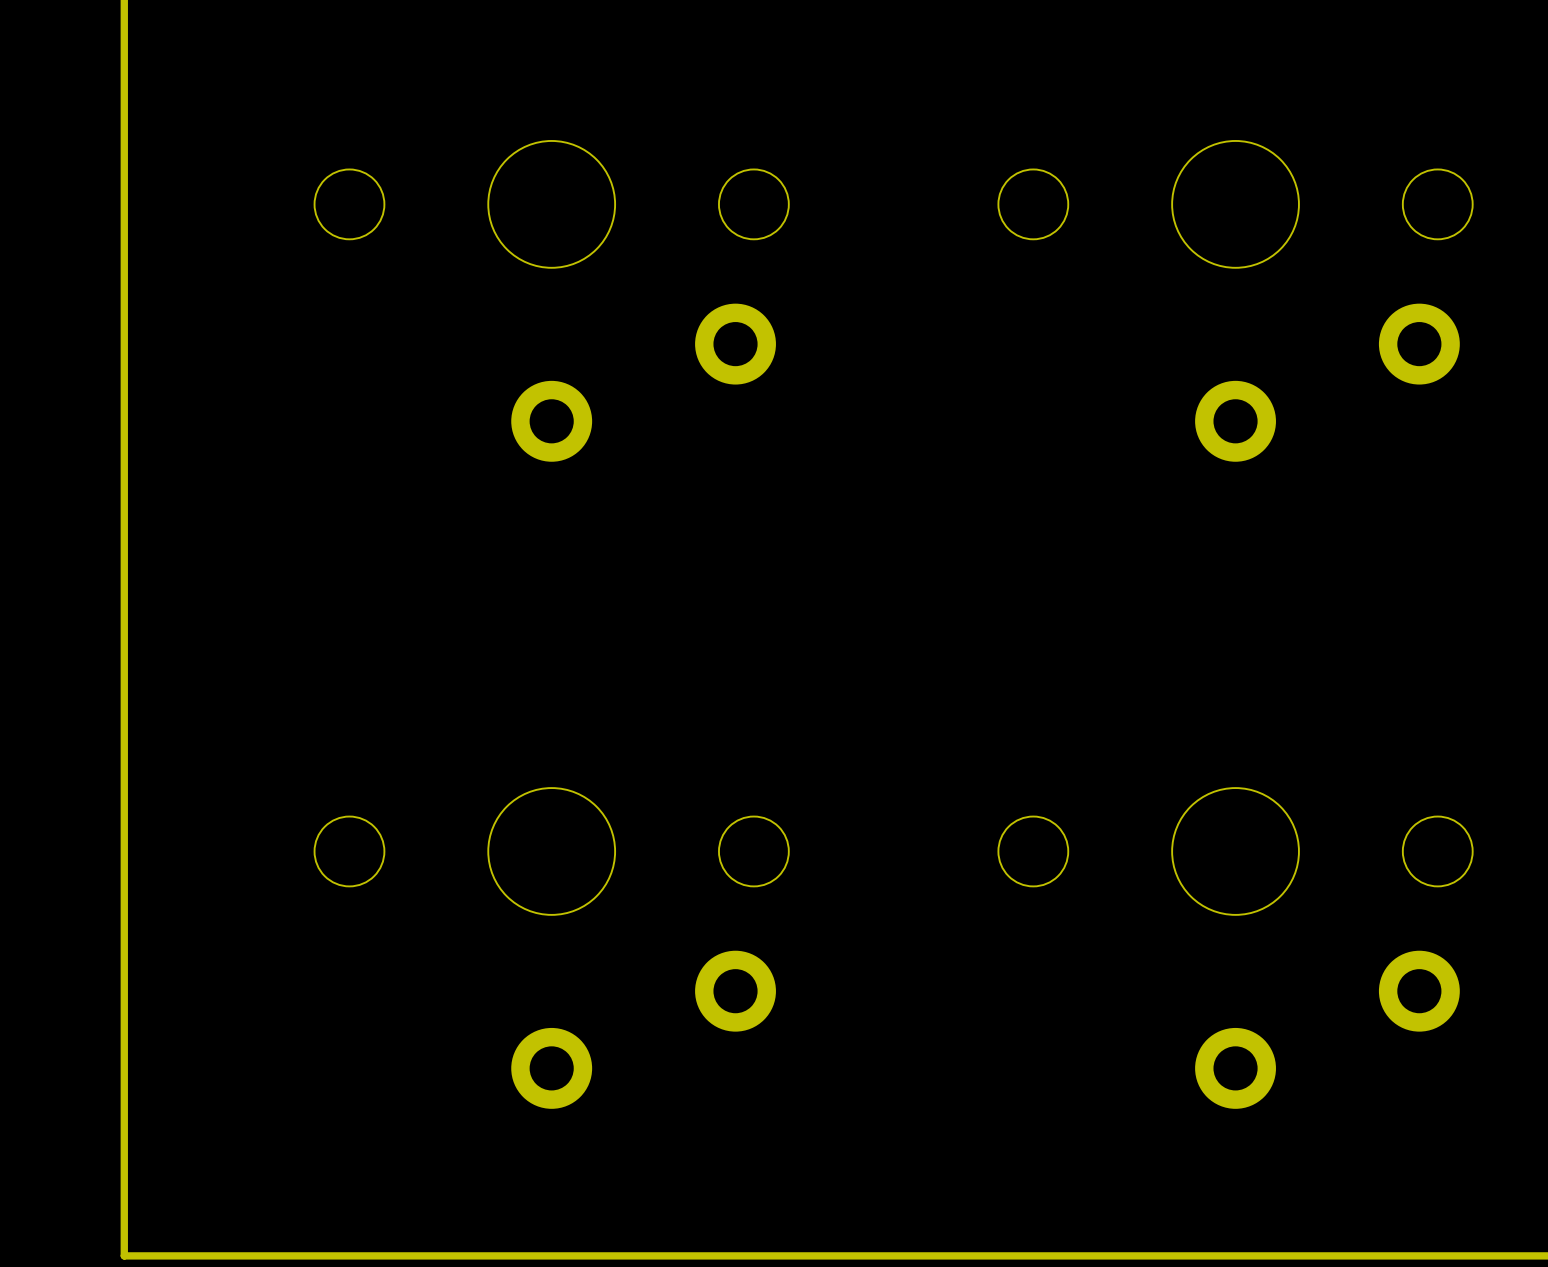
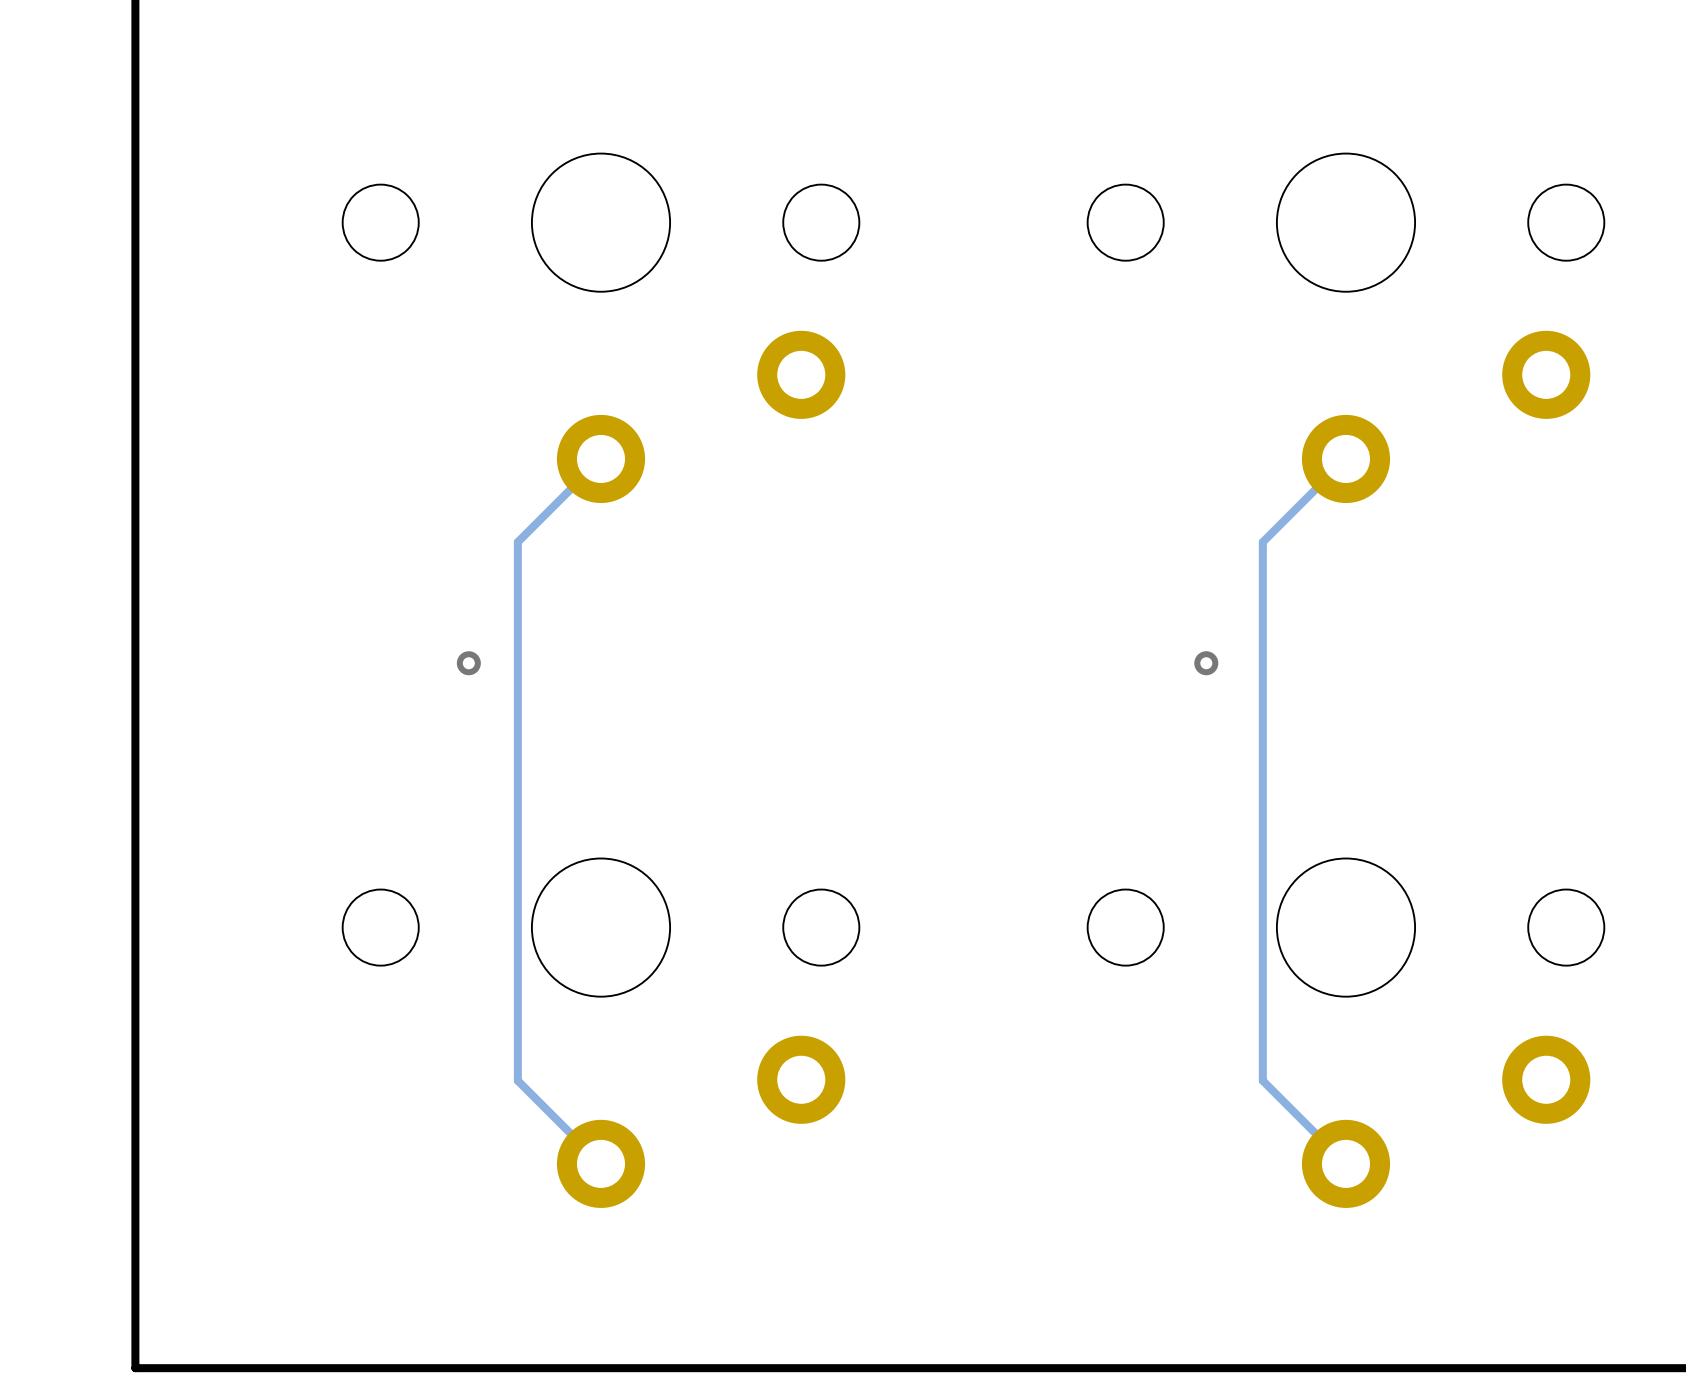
track: none -> (601, 458) (517, 542) (517, 1080) (601, 1163)
track: none -> (1345, 458) (1262, 542) (1262, 1080) (1345, 1163)
via: none -> (468, 663)
via: none -> (1206, 663)

